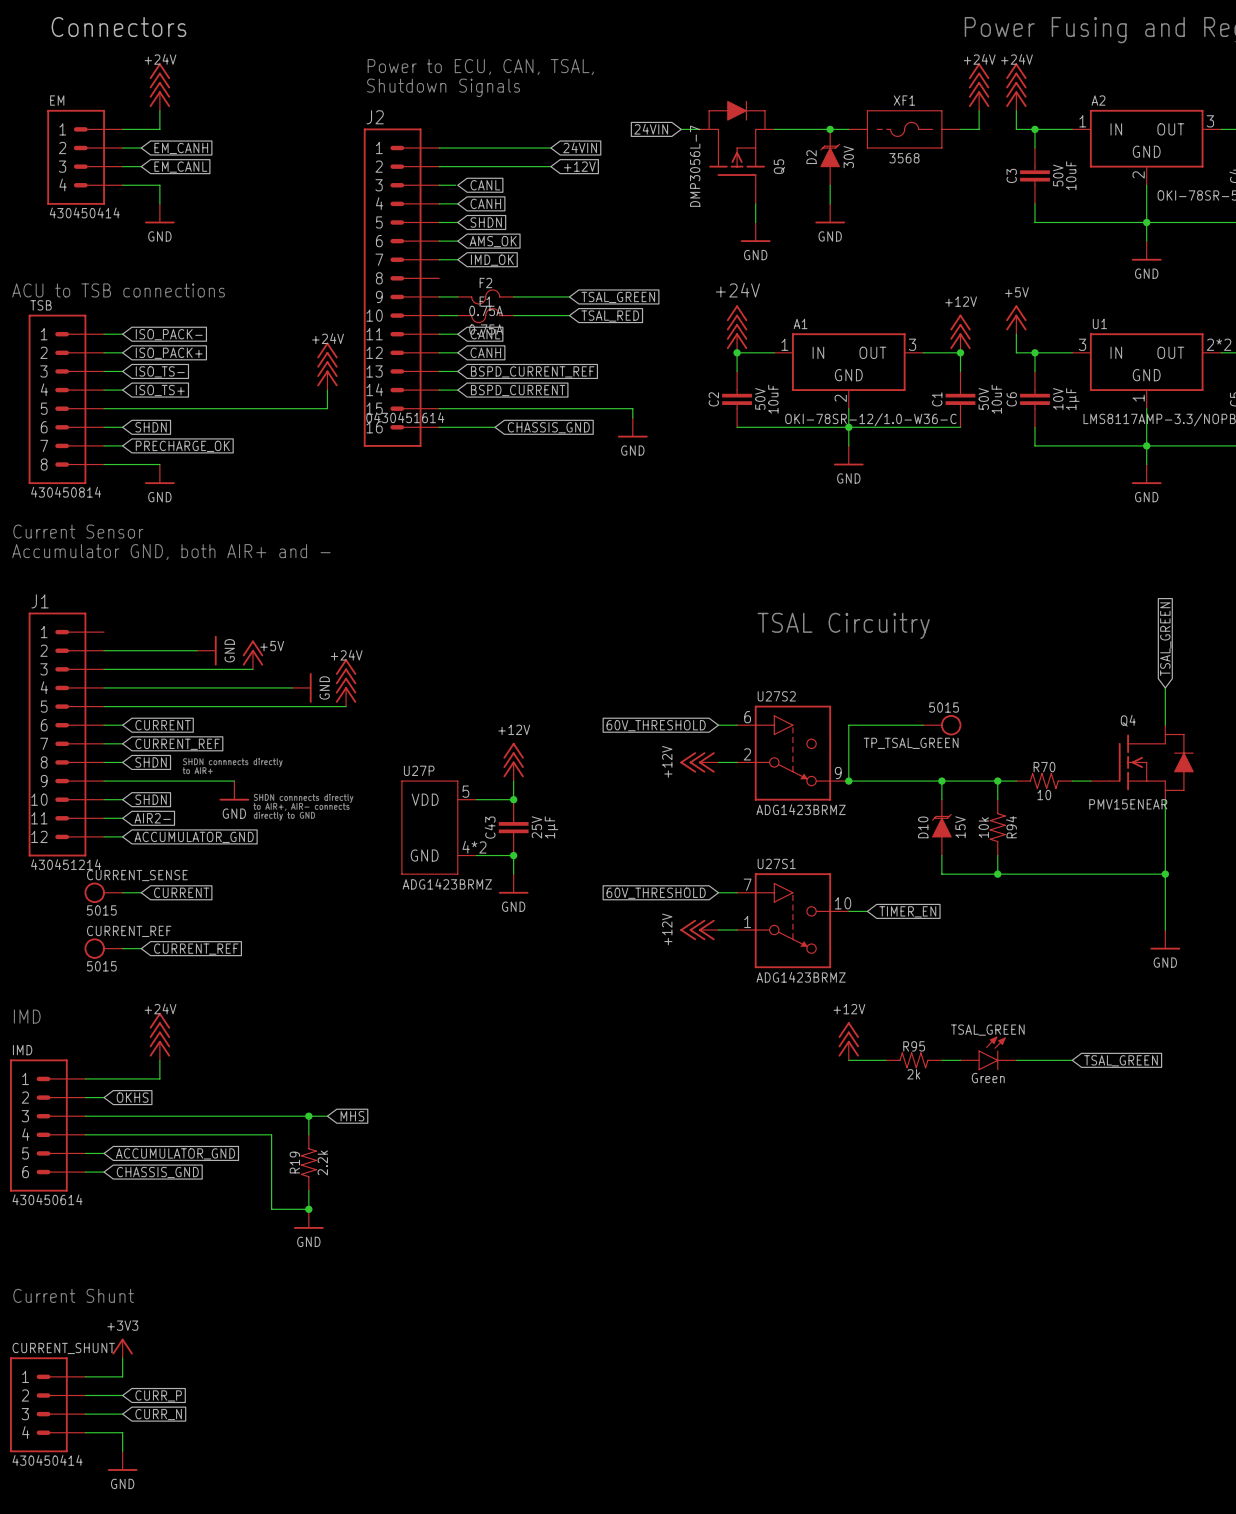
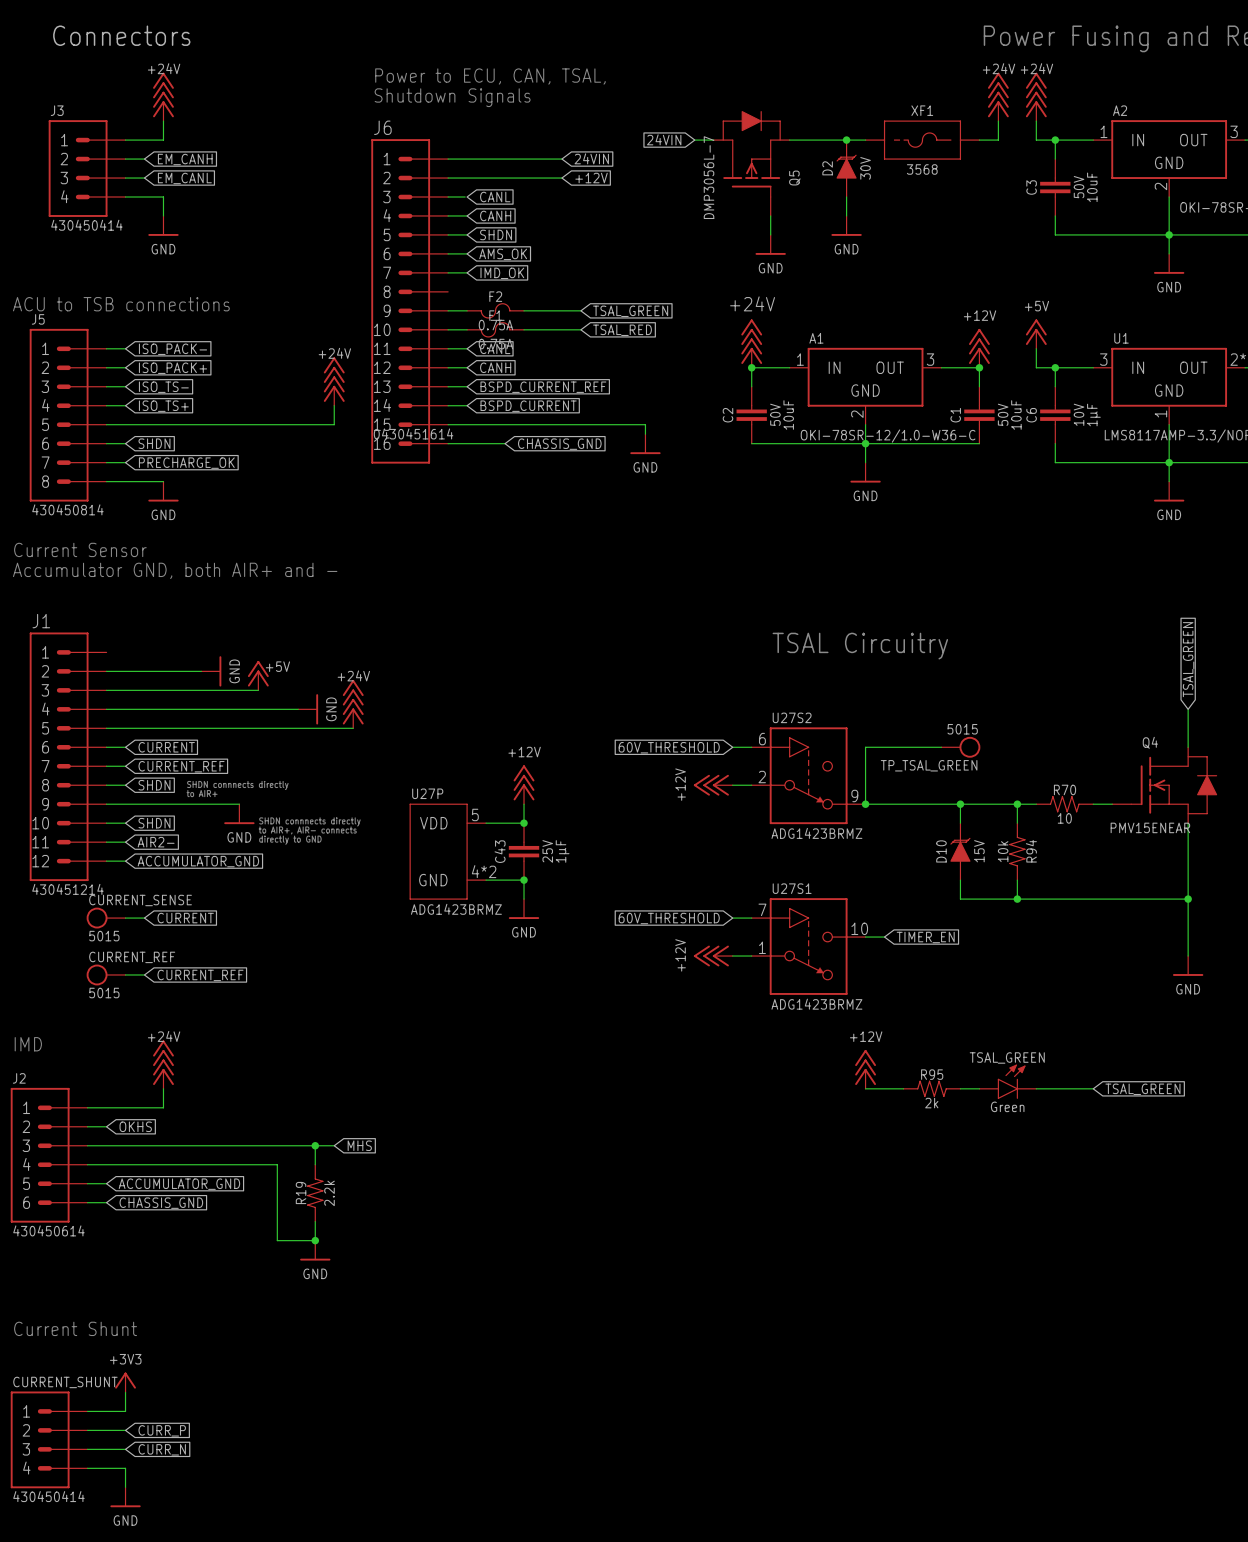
EM name: EM (57, 100) -> J3 (57, 110)
J2 name: J2 (375, 117) -> J6 (382, 127)
TSB name: TSB (41, 305) -> J5 (38, 319)
IMD name: IMD (22, 1050) -> J2 (19, 1078)

